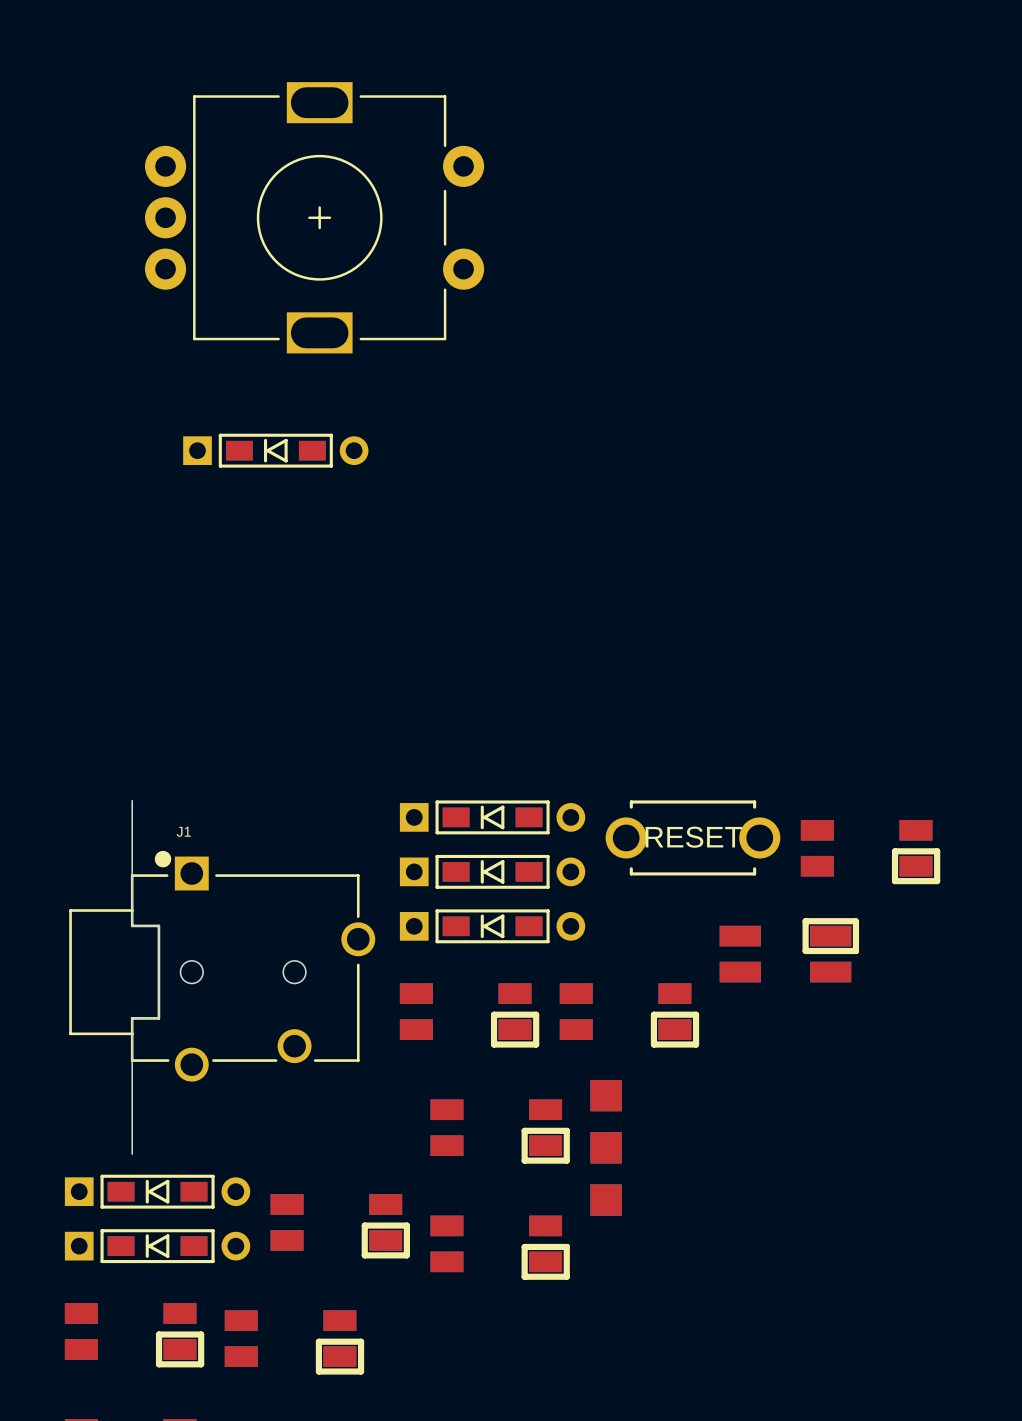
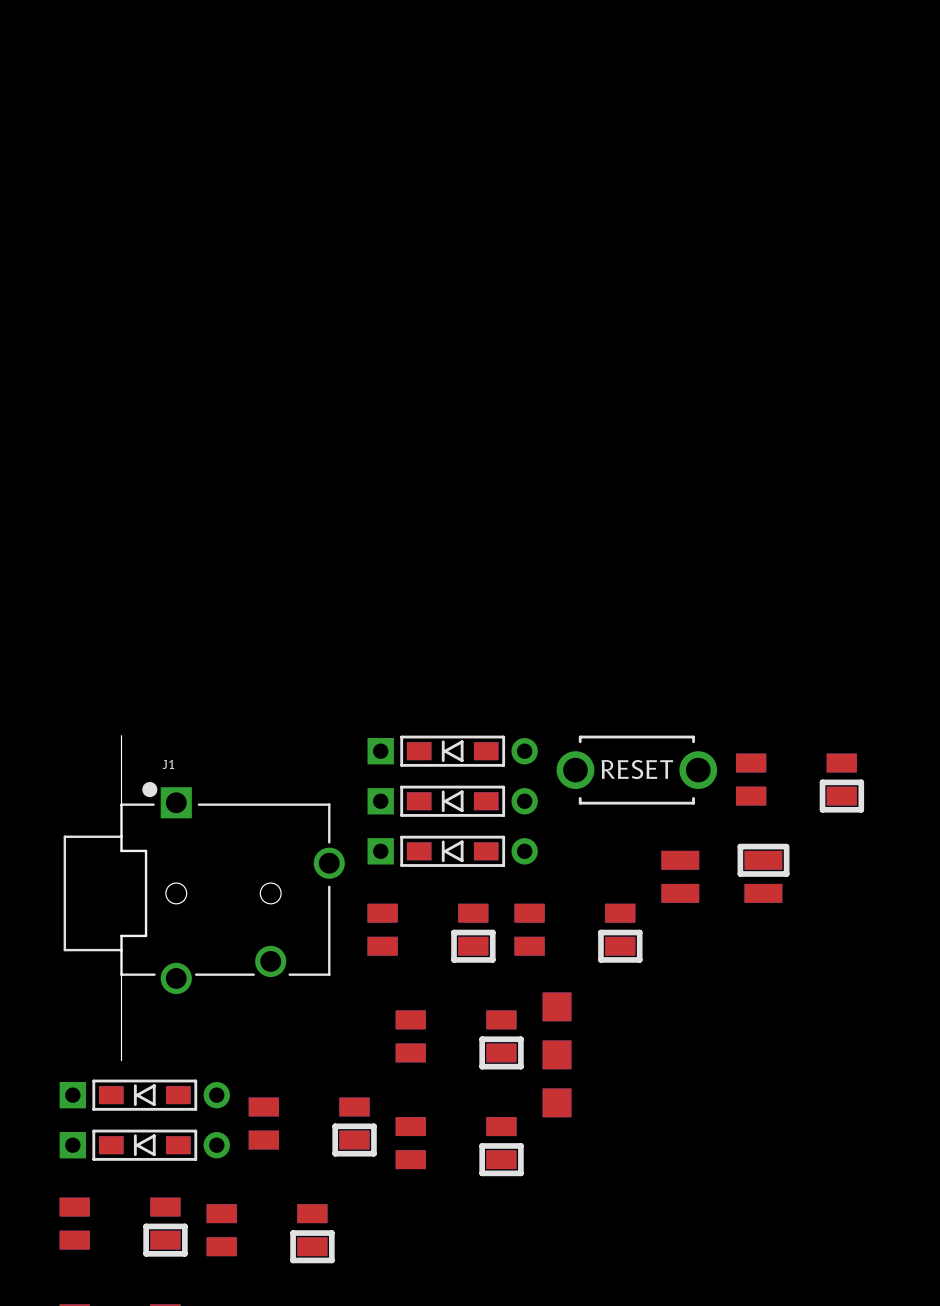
part: (314, 217) -> none
part: (275, 450) -> none

